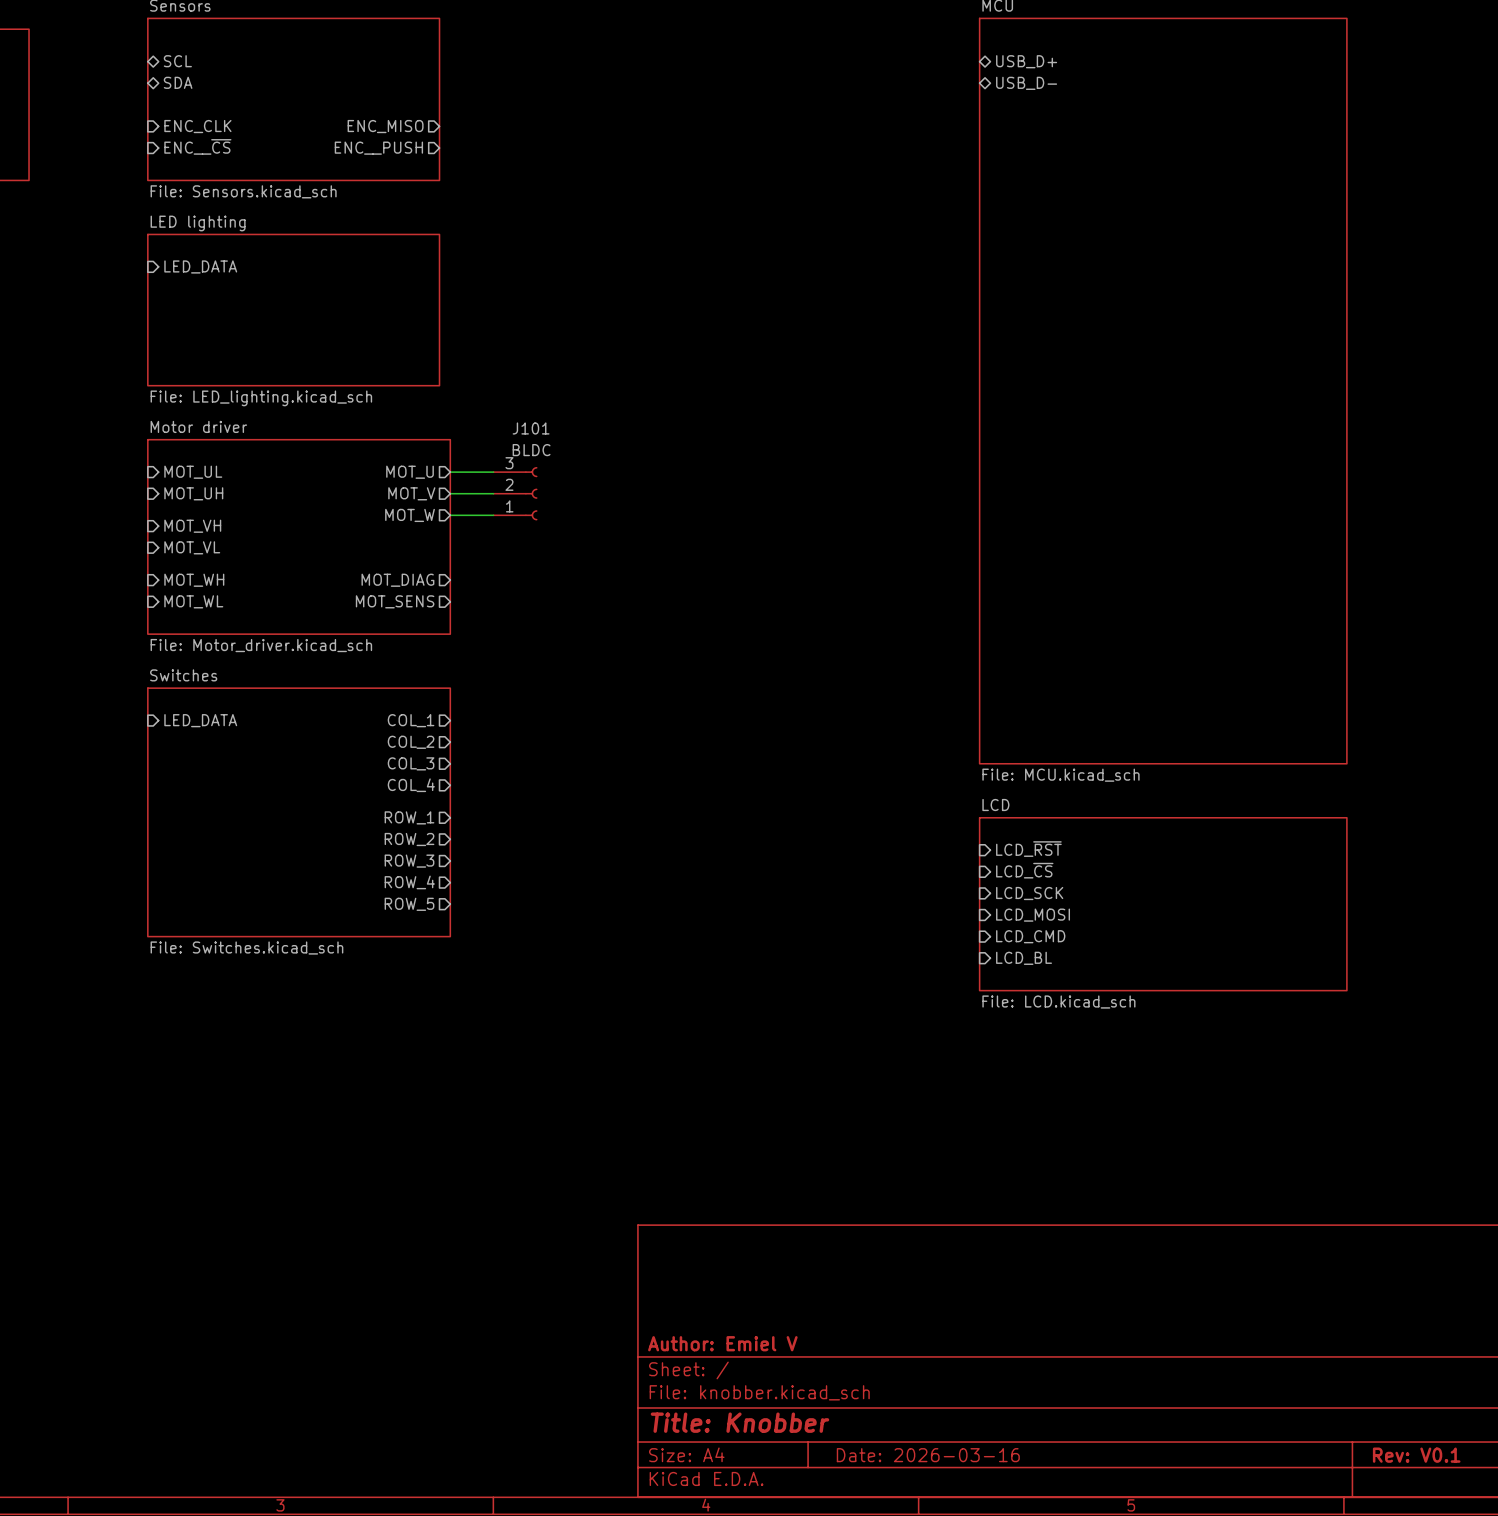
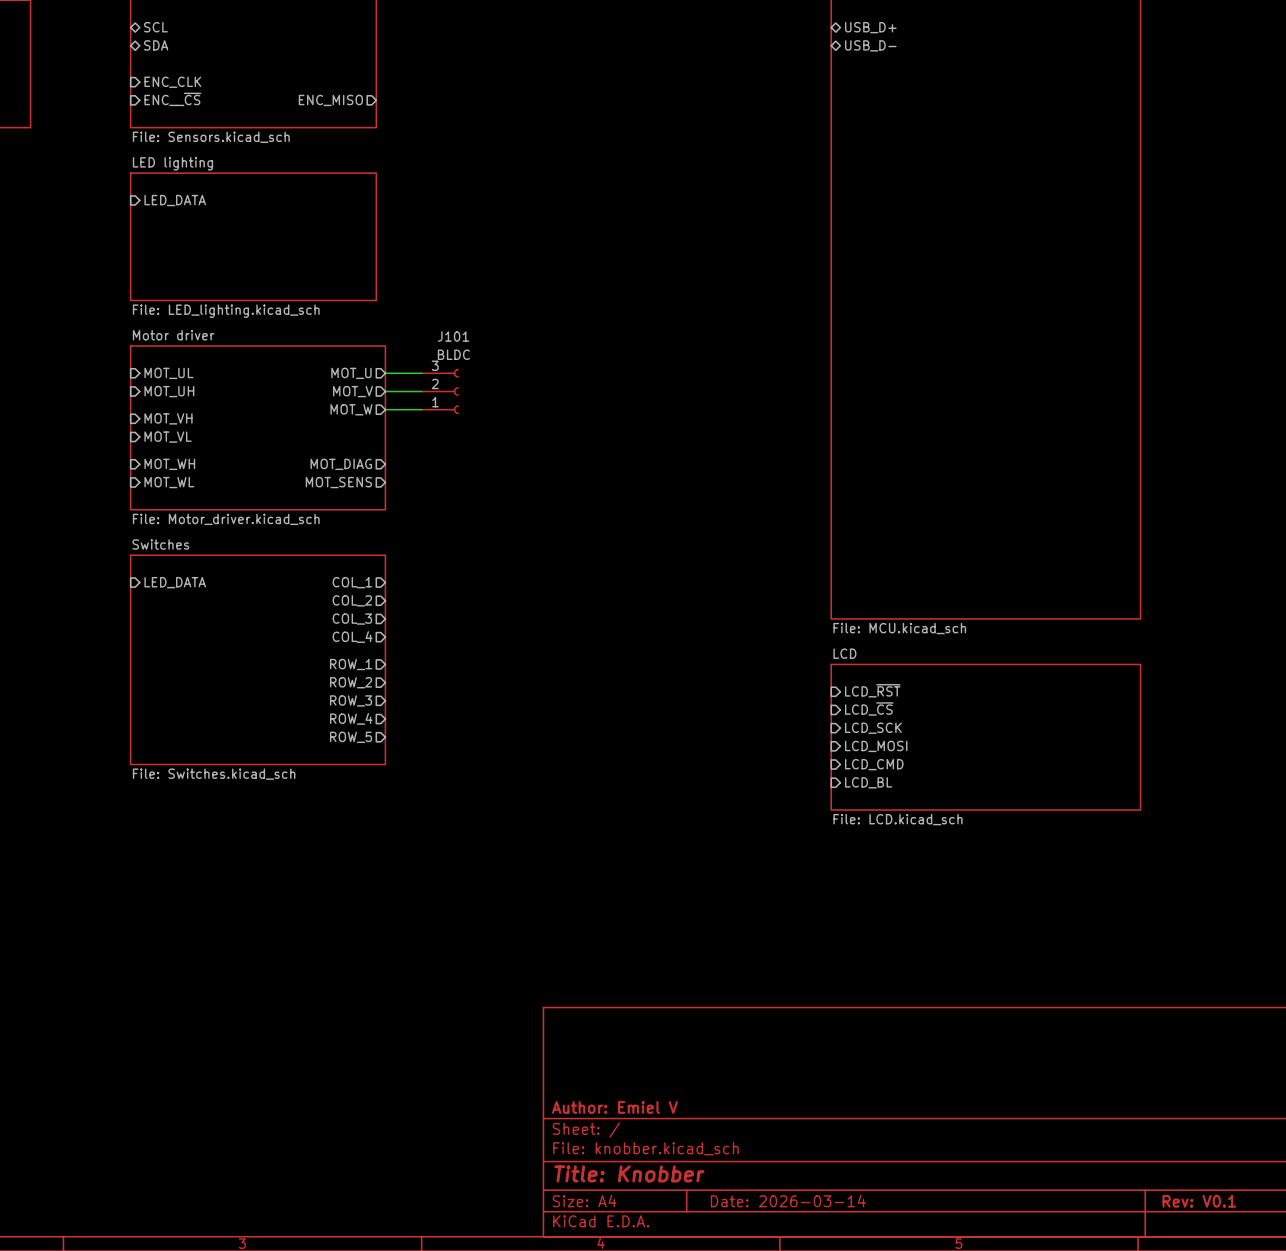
sheet pin: ENC_MISO (385, 126) -> none
sheet pin: ENC__PUSH (378, 148) -> ENC_MISO (330, 100)
title block: Date: 2026-03-16 (928, 1455) -> Date: 2026-03-14 (788, 1201)

